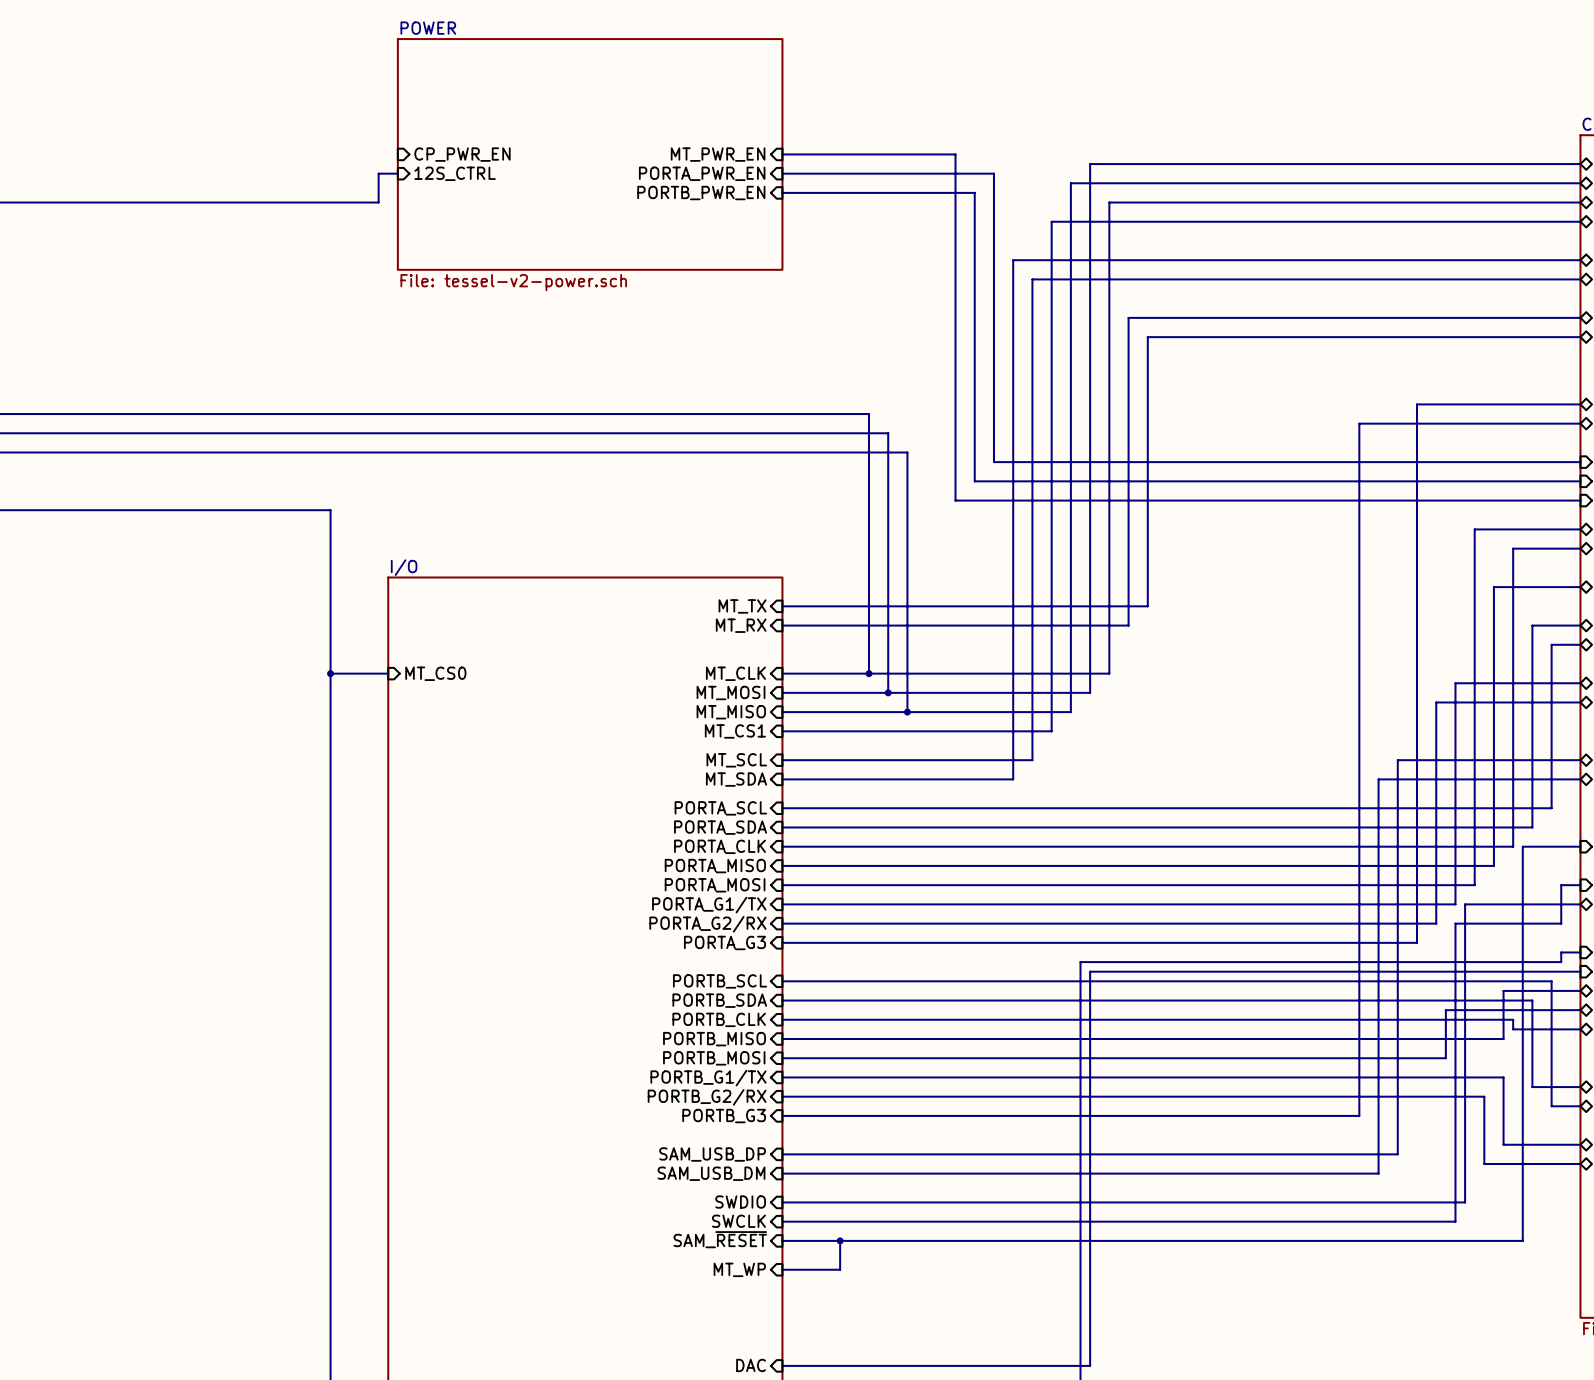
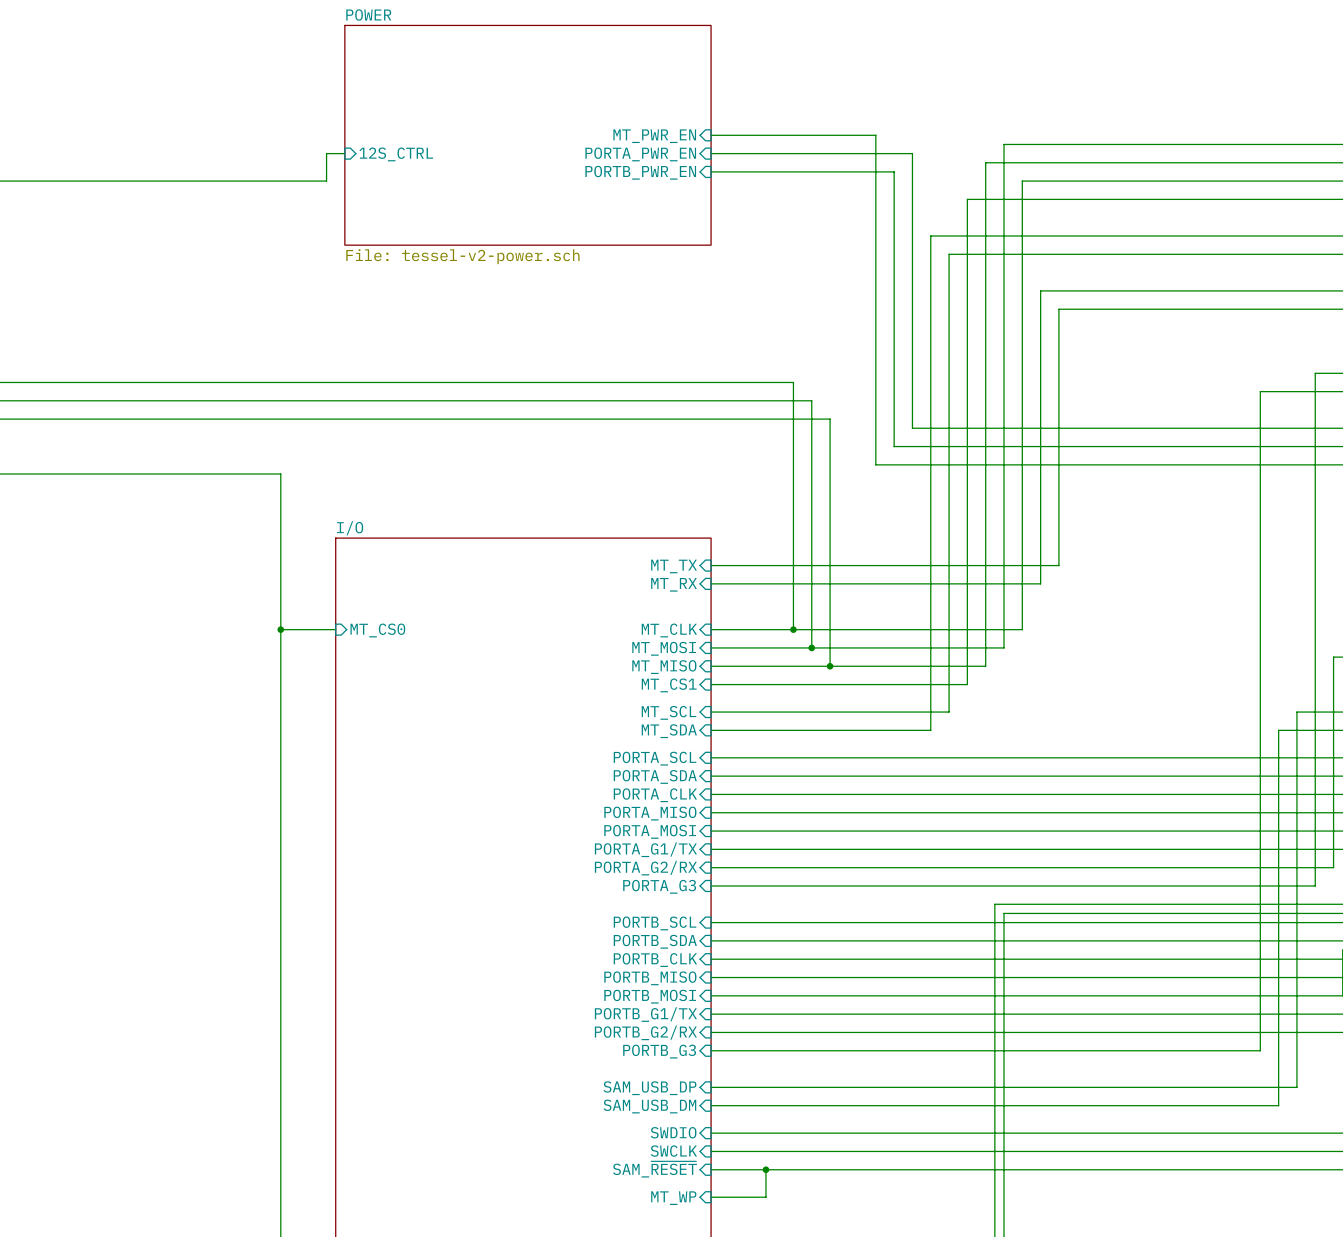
sheet pin: CP_PWR_EN (462, 154) -> none

